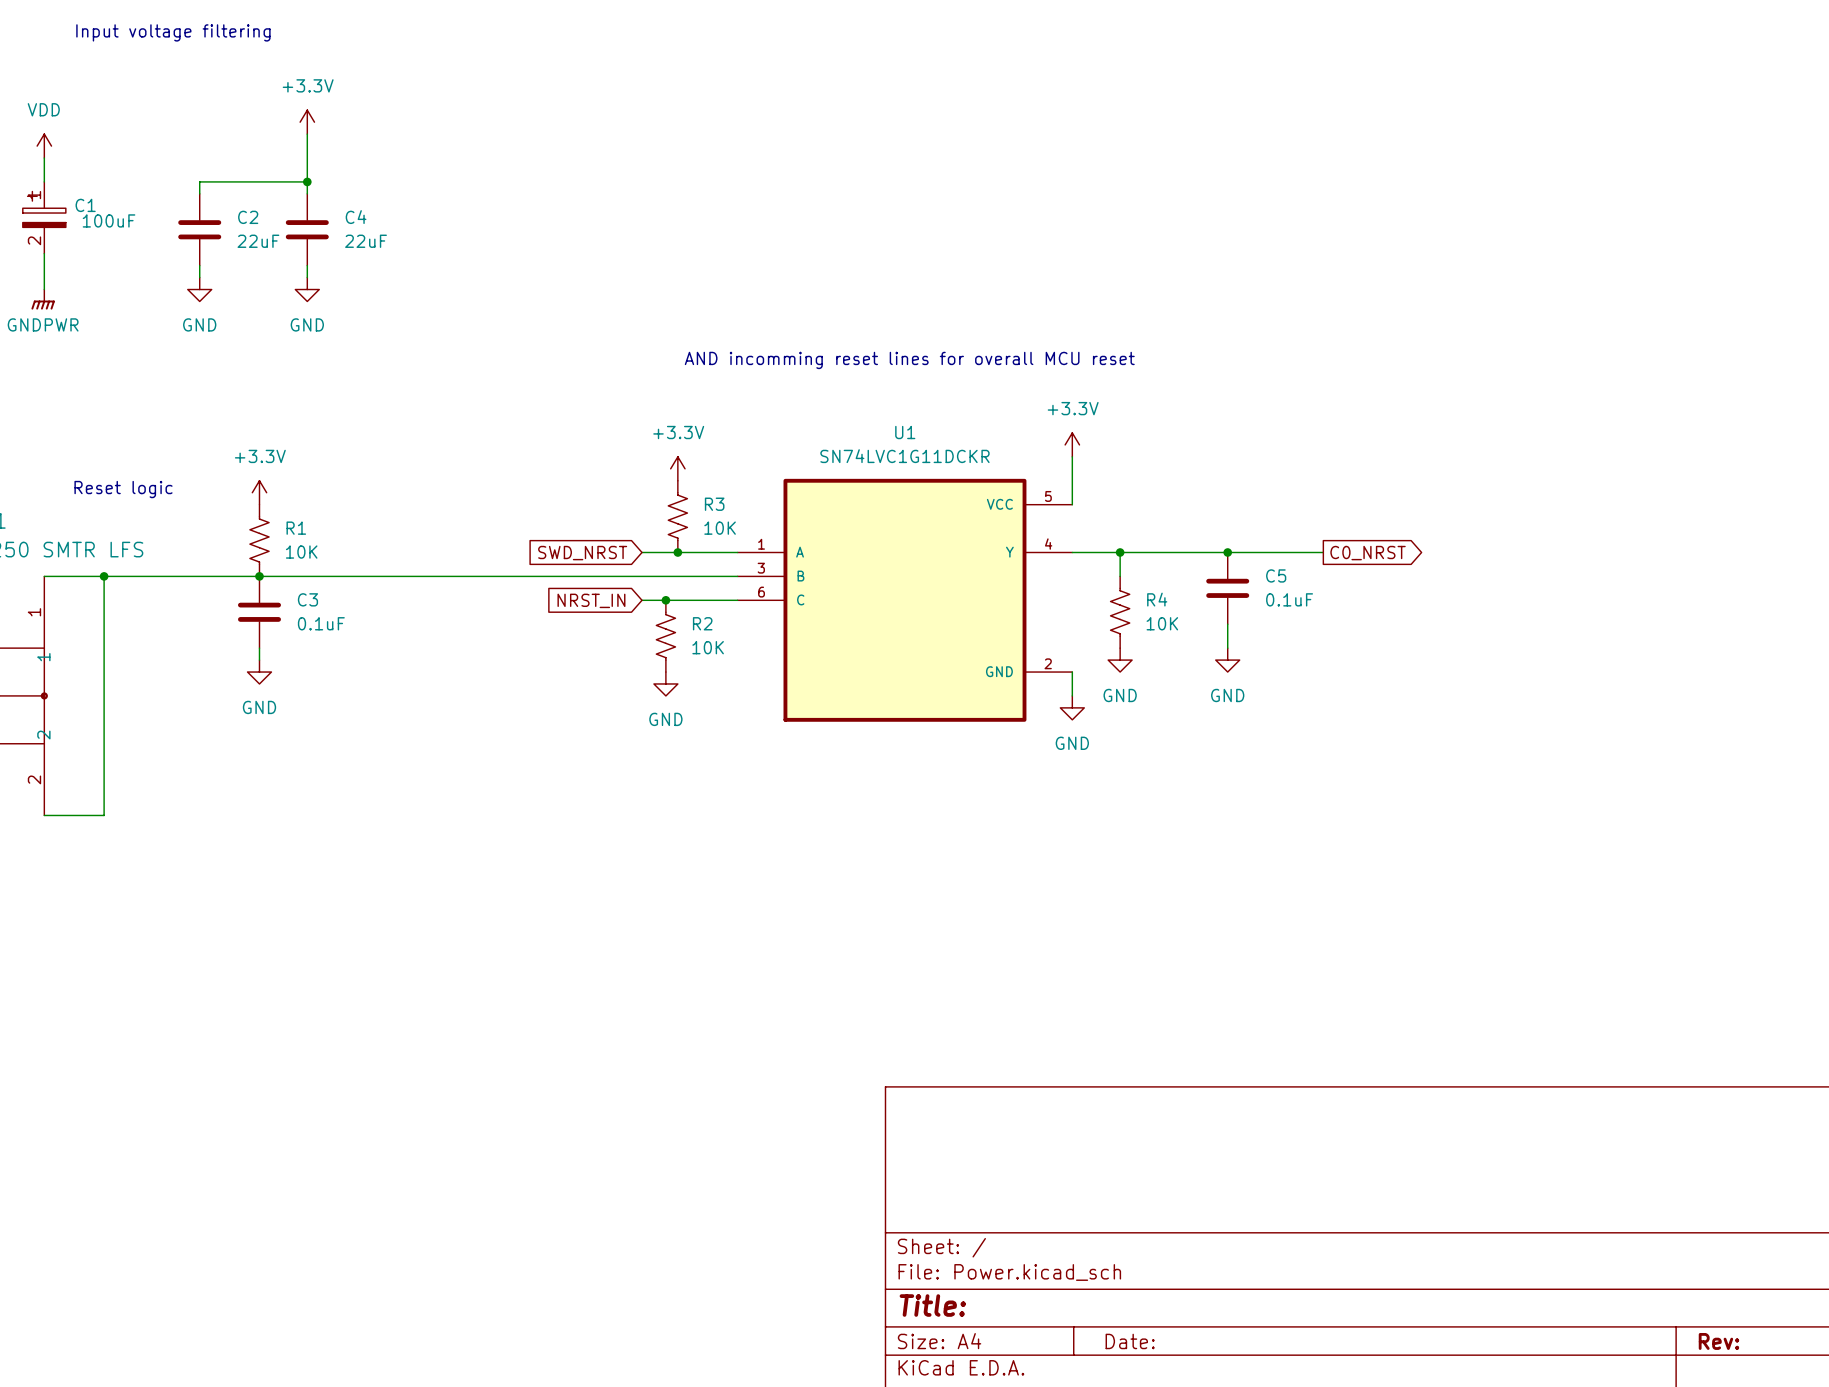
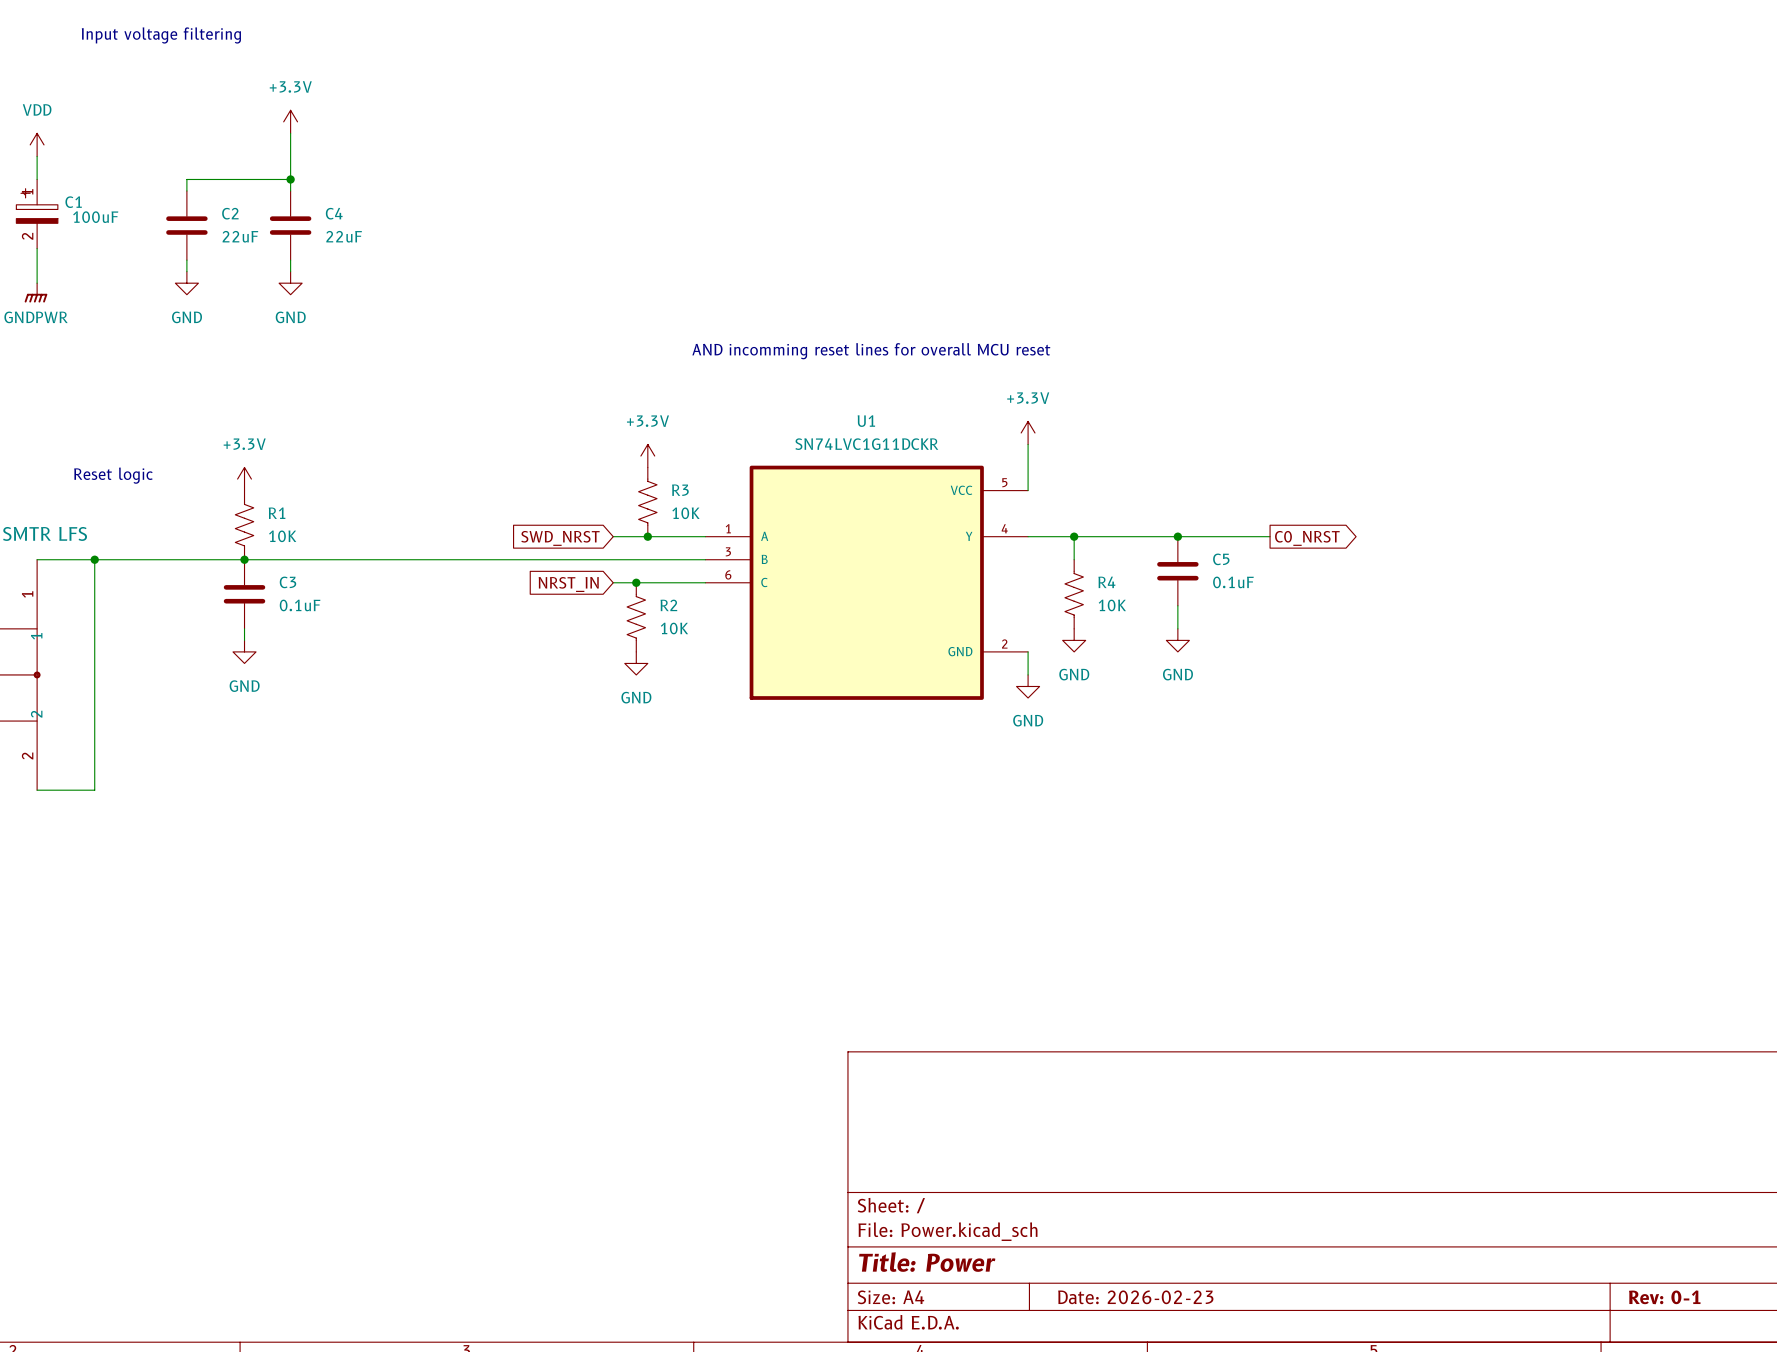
title block: Title: (932, 1305) -> Title: Power (927, 1262)
title block: Date: (1130, 1341) -> Date: 2026-02-23 (1135, 1297)
title block: Rev: (1718, 1341) -> Rev: 0-1 (1664, 1297)

